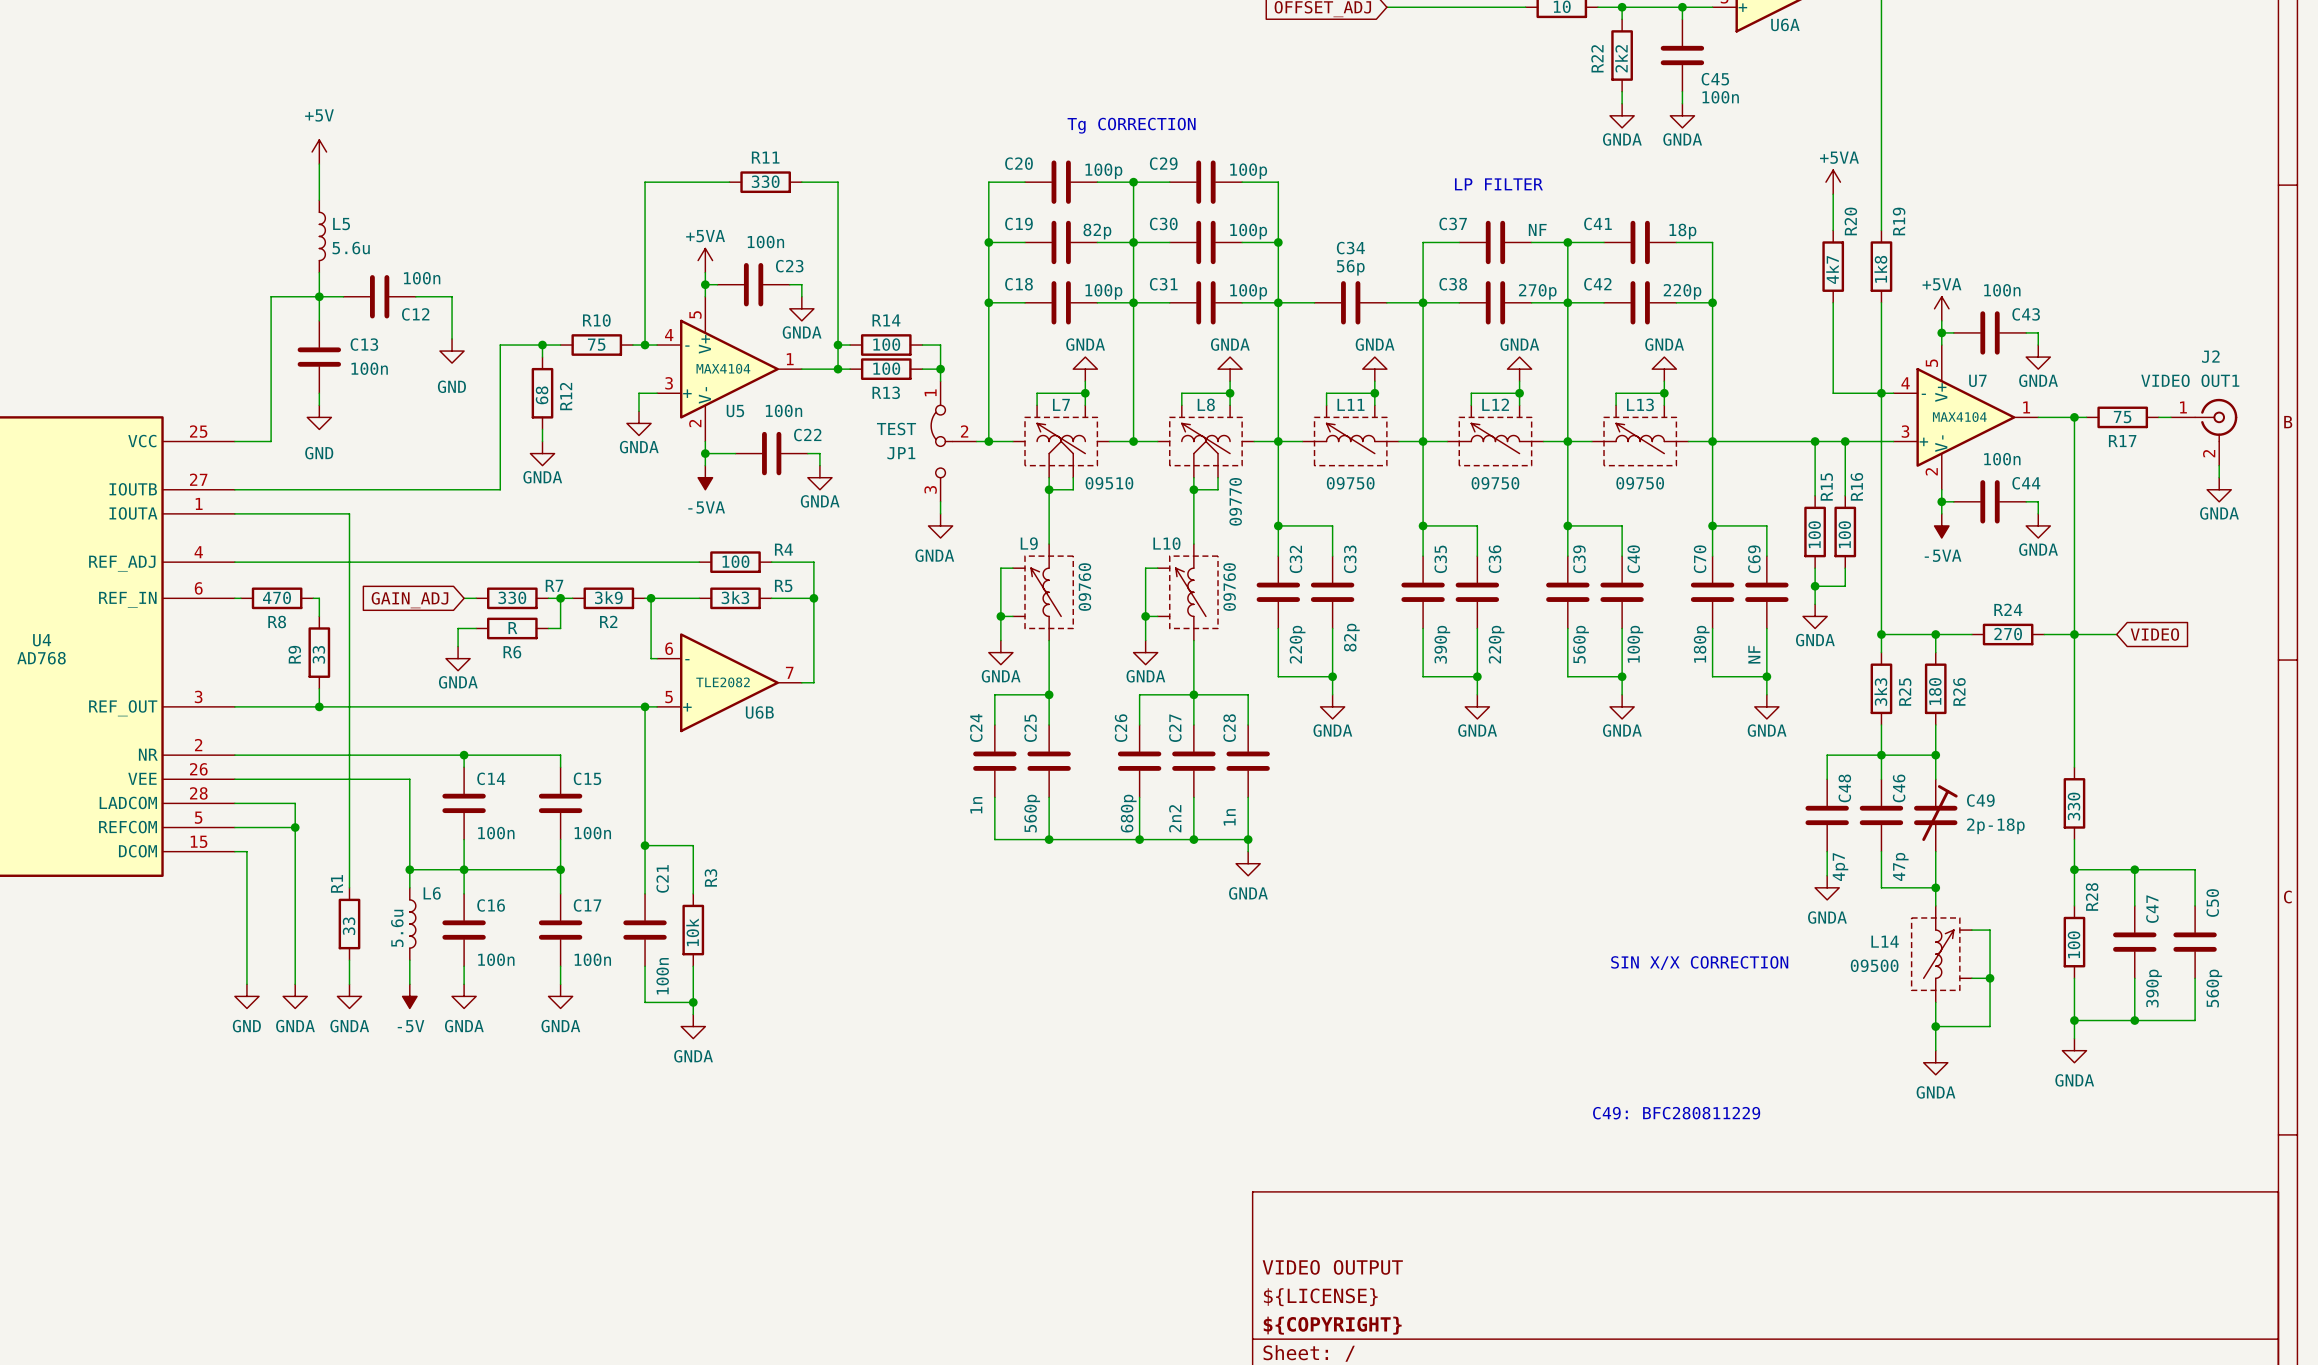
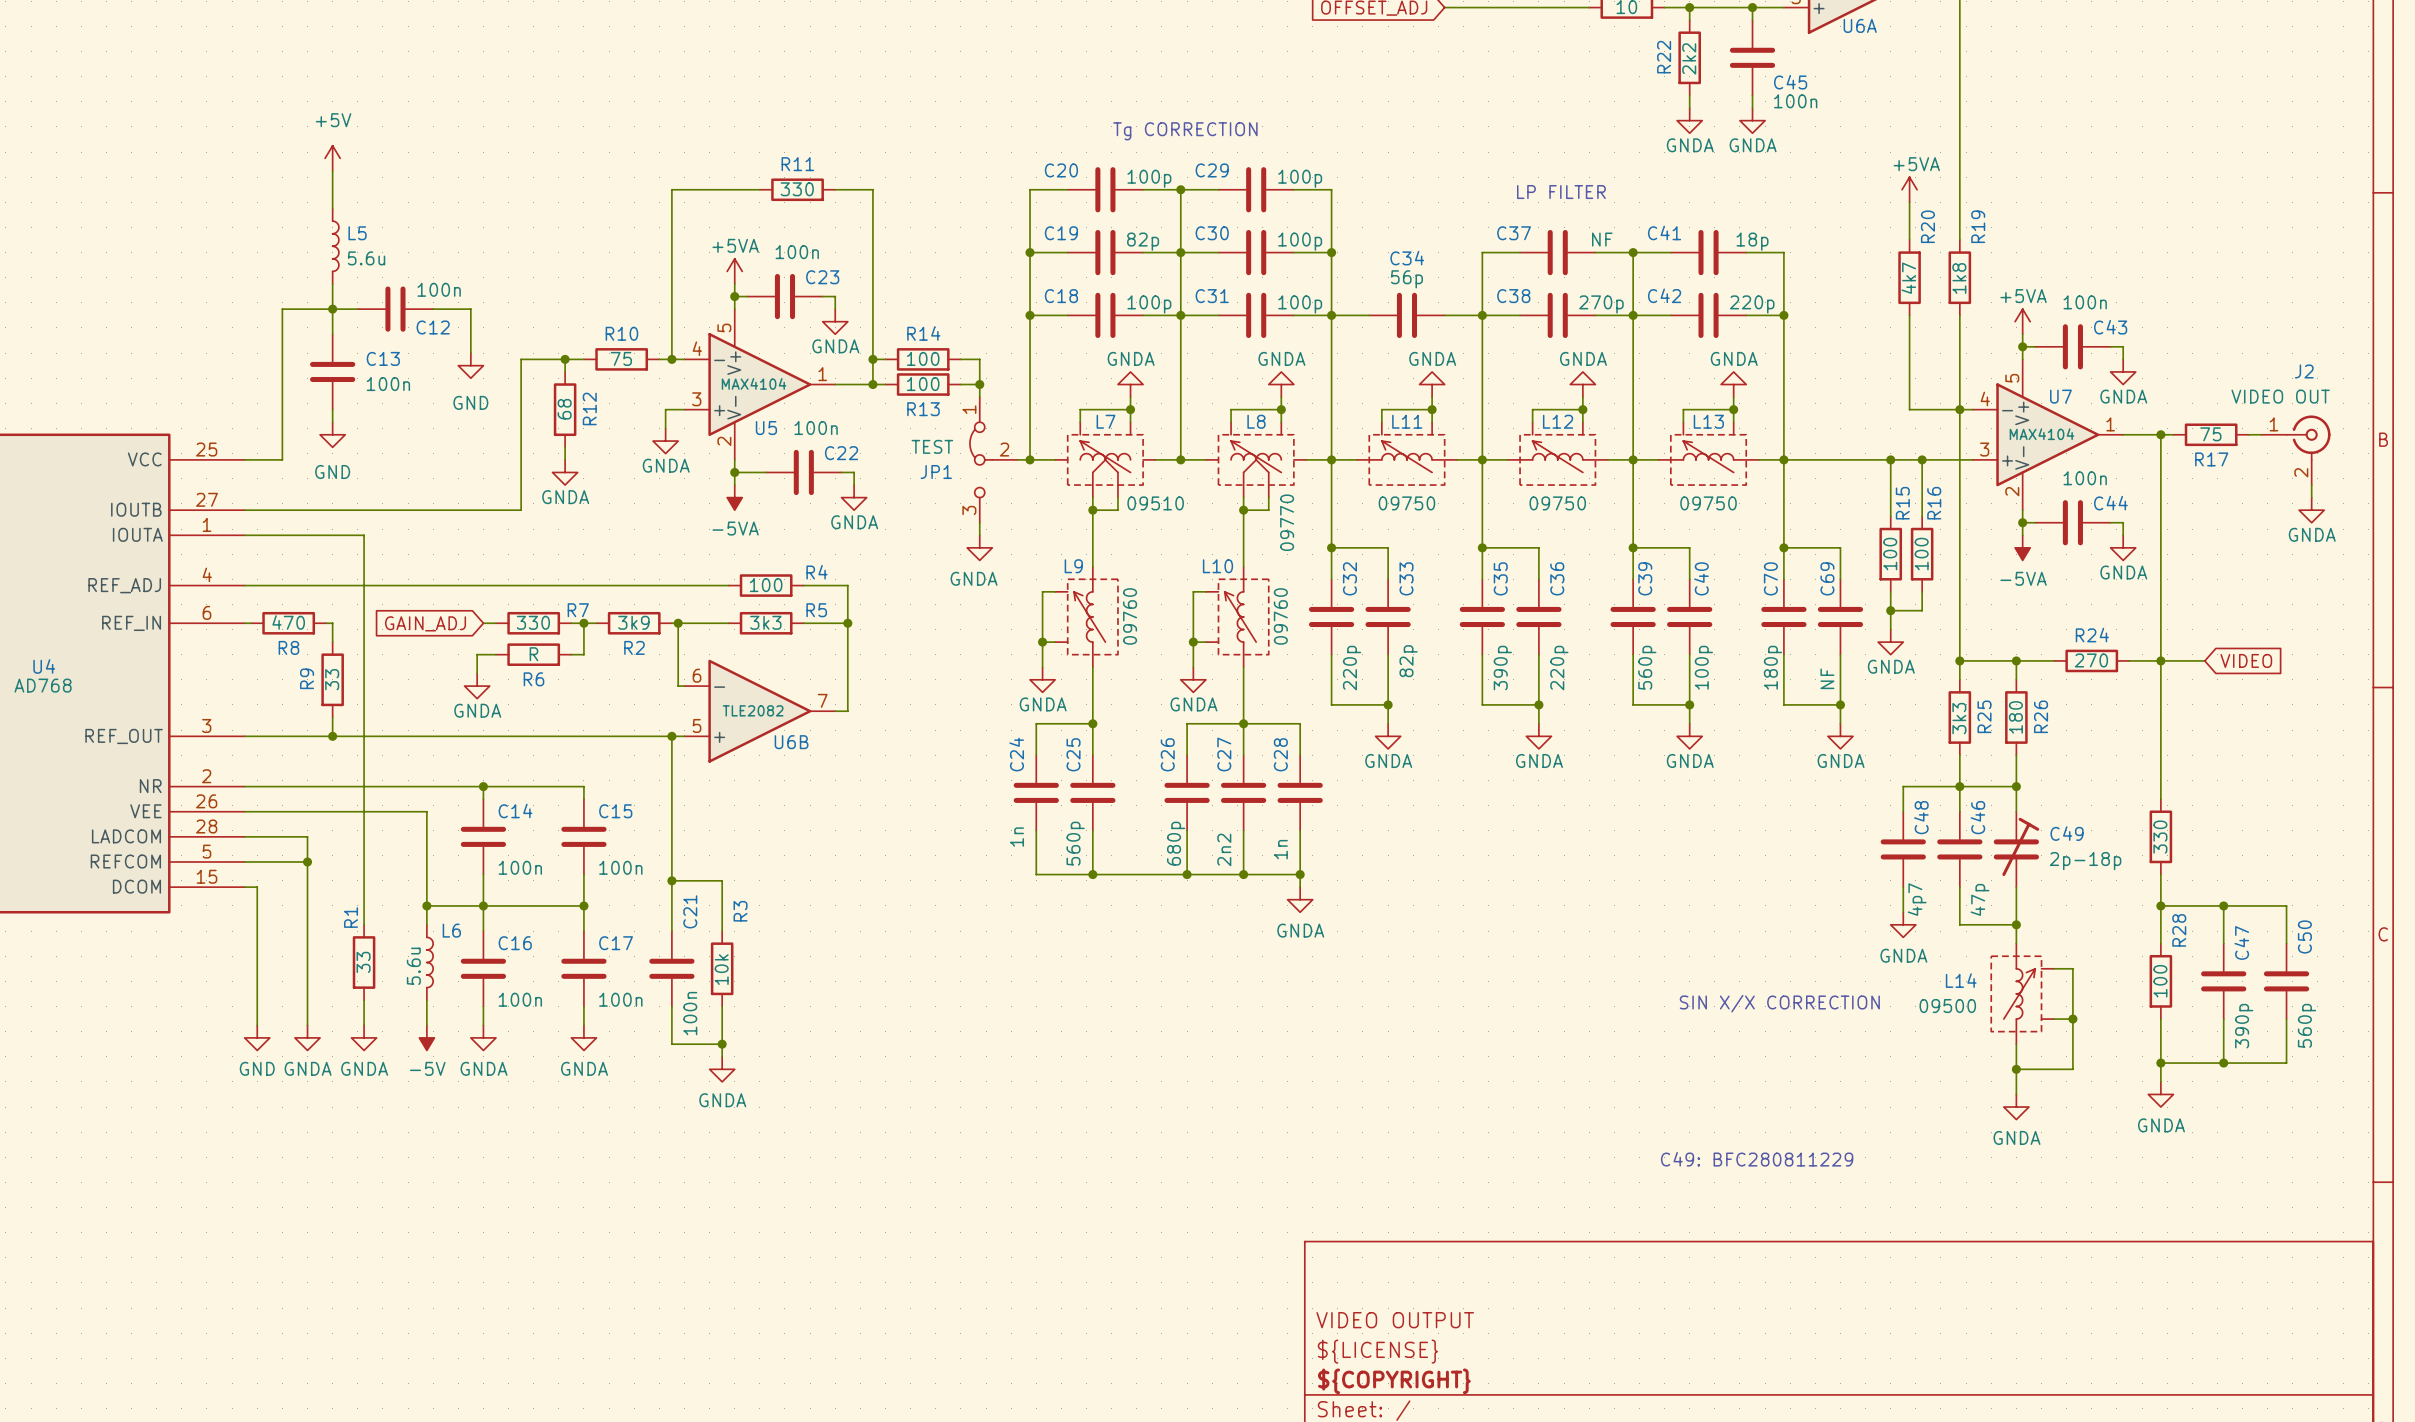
J2 value: VIDEO OUT1 (2190, 380) -> VIDEO OUT (2280, 396)

